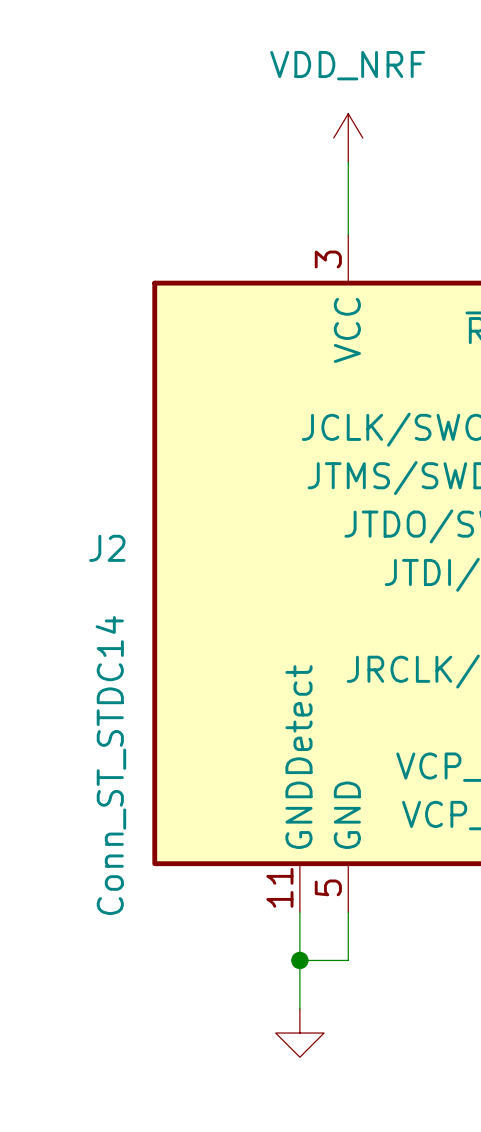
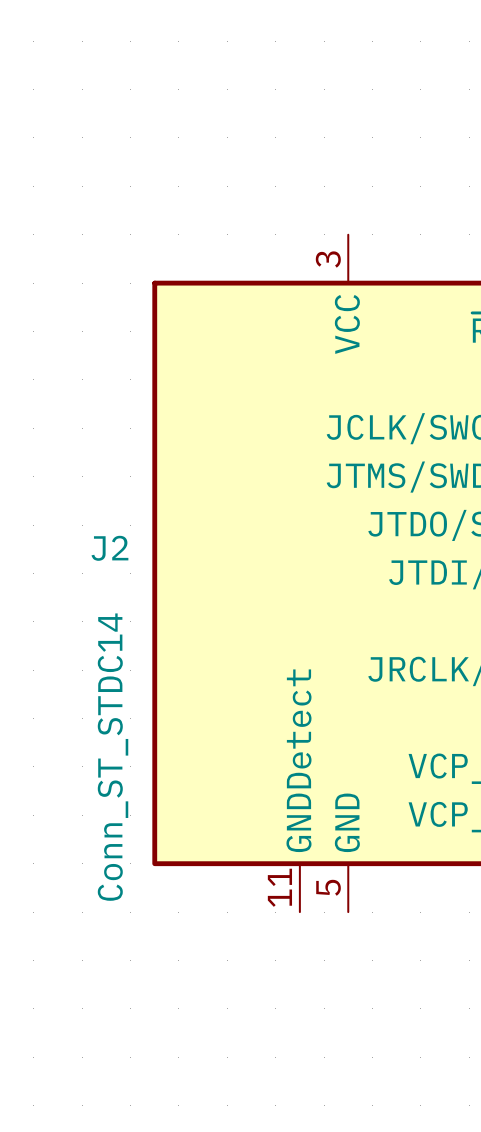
power symbol: VDD_NRF (348, 137) -> none
wire: (348, 162) (348, 234) -> none
wire: (299, 912) (299, 1008) -> none
wire: (348, 912) (348, 960) (299, 960) -> none
junction: (299, 960) -> none
power symbol: (299, 1033) -> none

